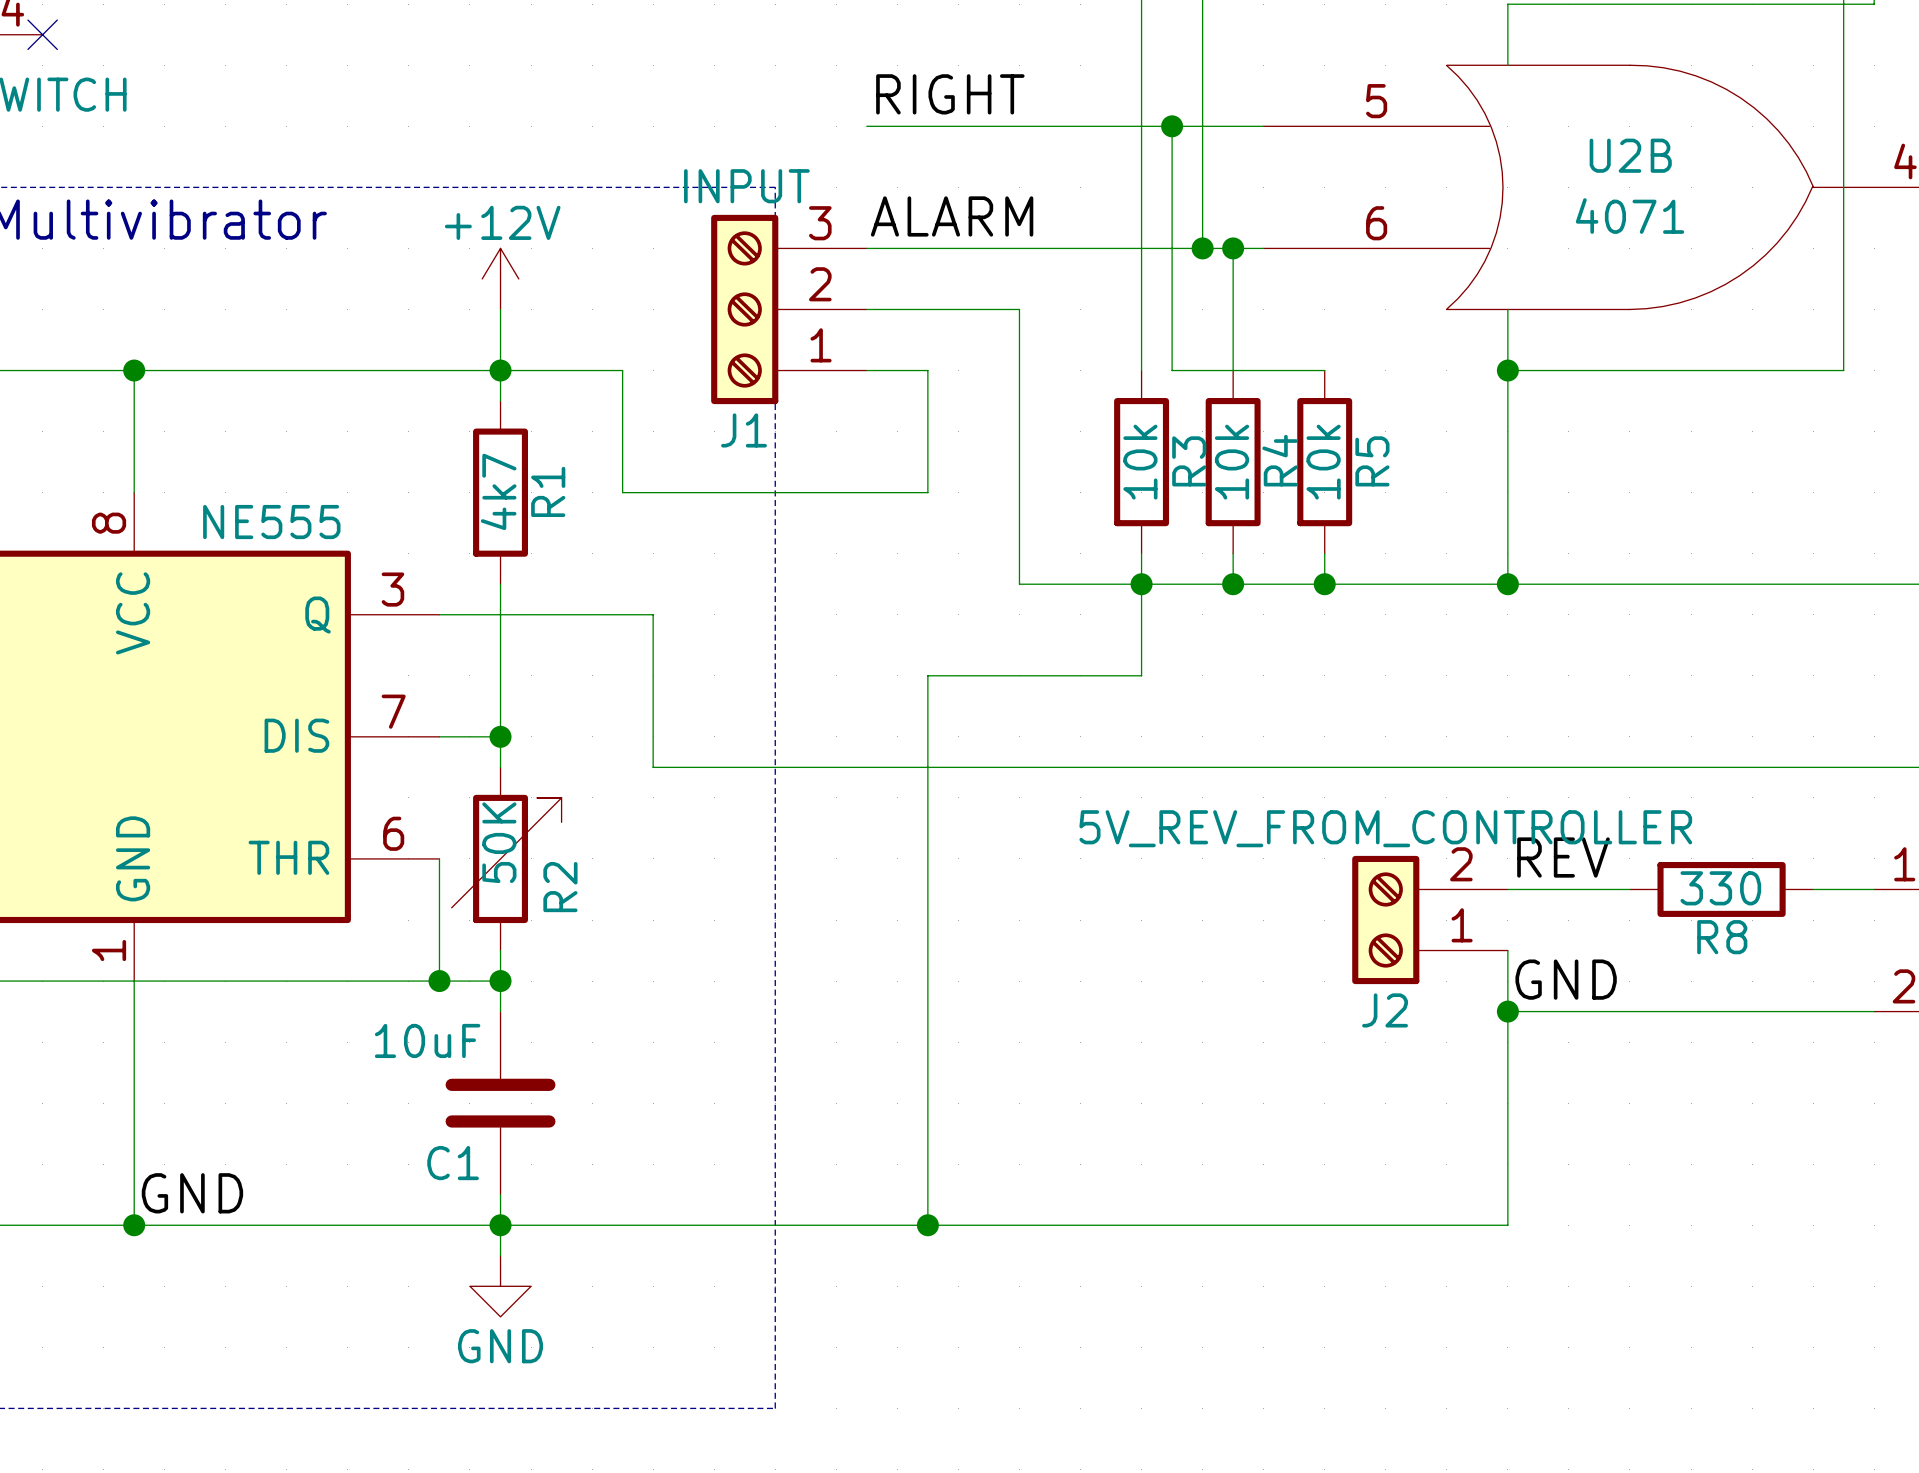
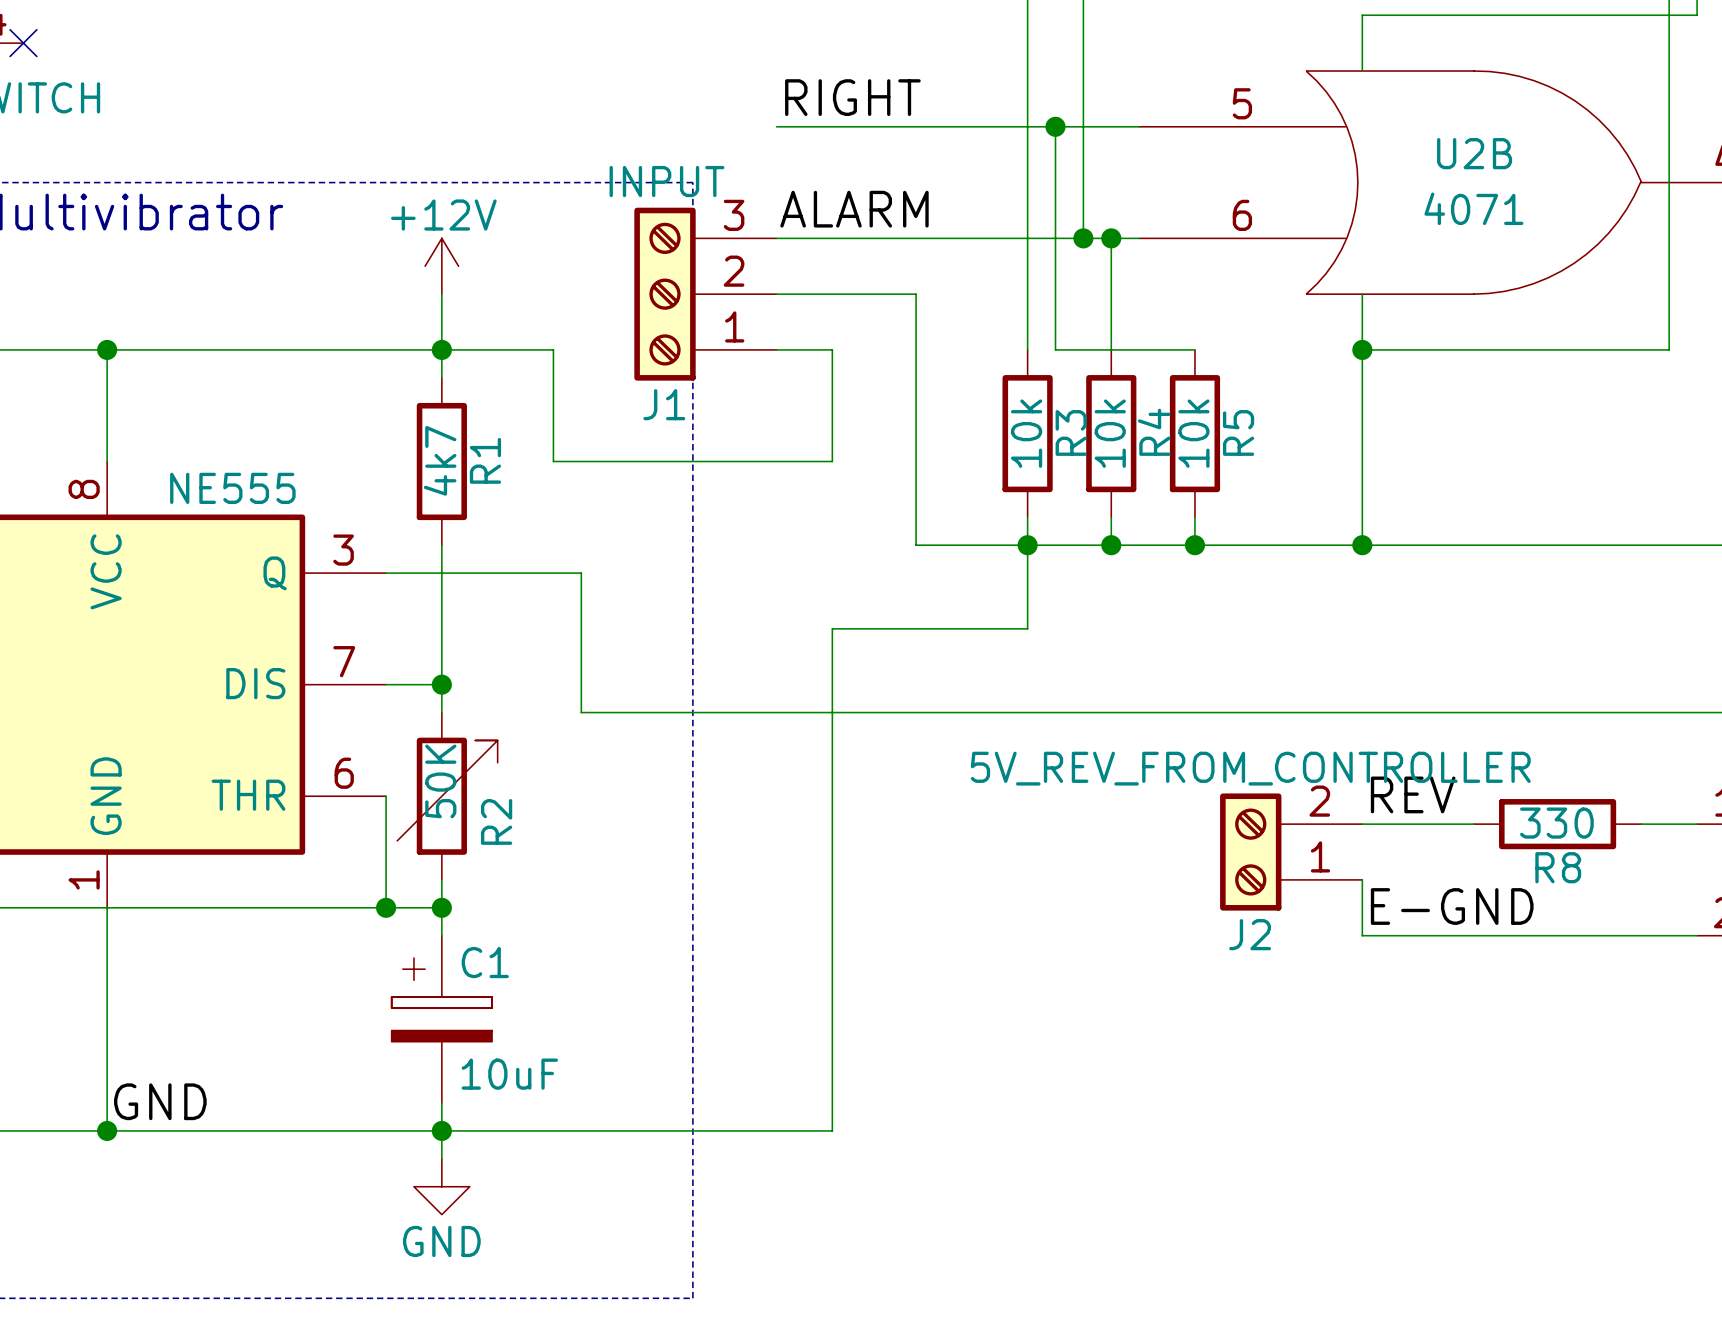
label: GND (1566, 979) -> E-GND (1452, 906)
C1 symbol: [445, 1011, 556, 1195] -> [391, 935, 493, 1104]
wire: (1507, 1011) (1507, 1225) (927, 1225) -> none
junction: (1507, 1011) -> none
C1 value position: 10uF (427, 1040) -> 10uF (509, 1074)
C1 name position: C1 (453, 1163) -> C1 (485, 962)
junction: (927, 1225) -> none

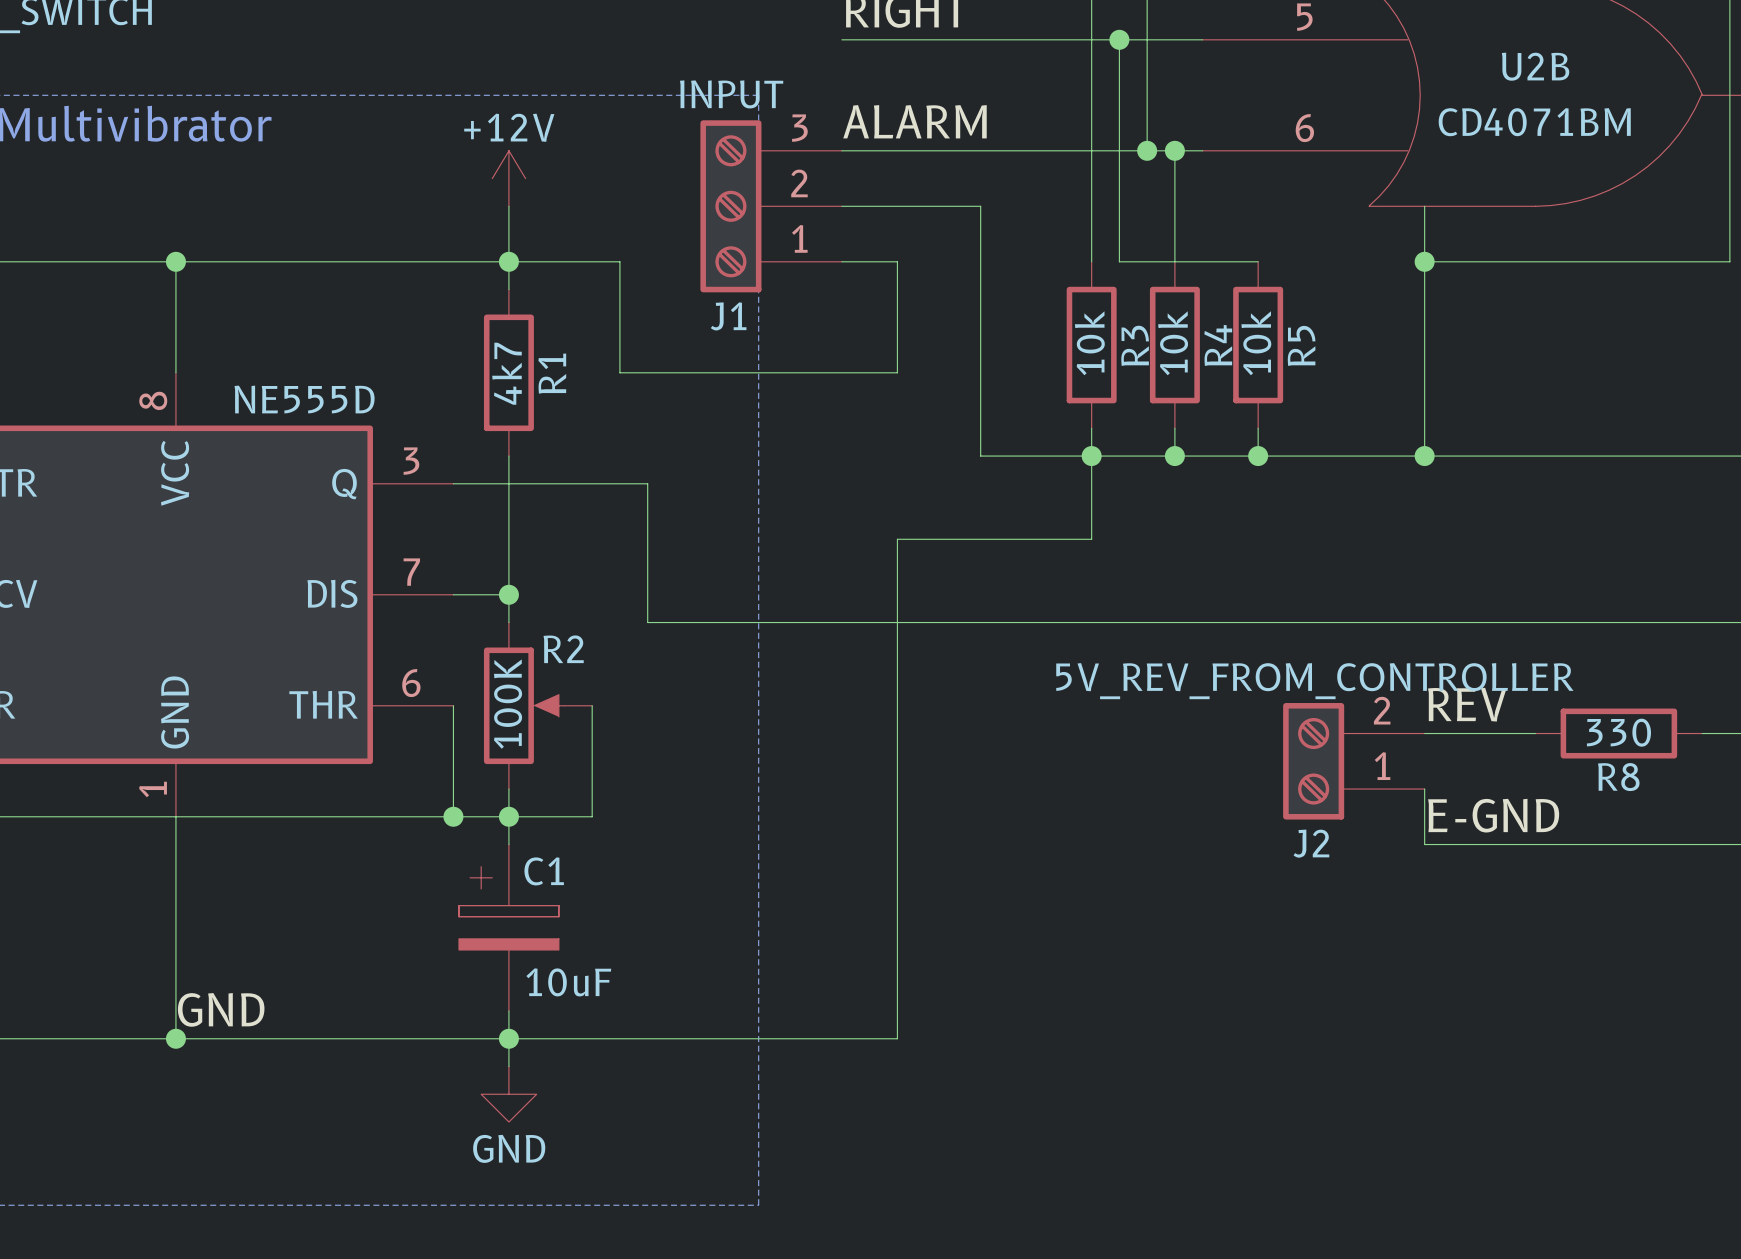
U2B value: 4071 (1473, 208) -> CD4071BM (1534, 122)
part value: NE555 (232, 488) -> NE555D (304, 399)
R2 symbol: [397, 712, 498, 880] -> [483, 622, 593, 790]
R2 value: 50K (440, 781) -> 100K (508, 704)
wire: none -> (592, 705) (592, 816) (508, 816)
R2 name position: R2 (496, 821) -> R2 (563, 649)

